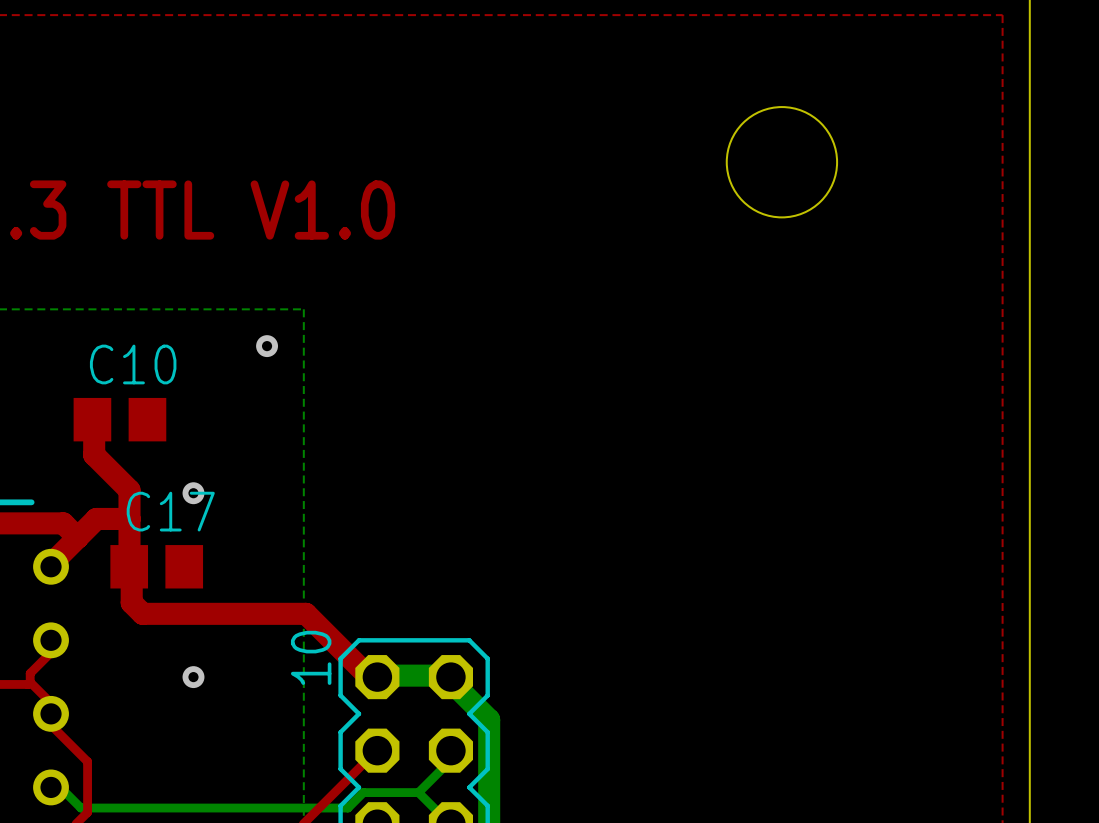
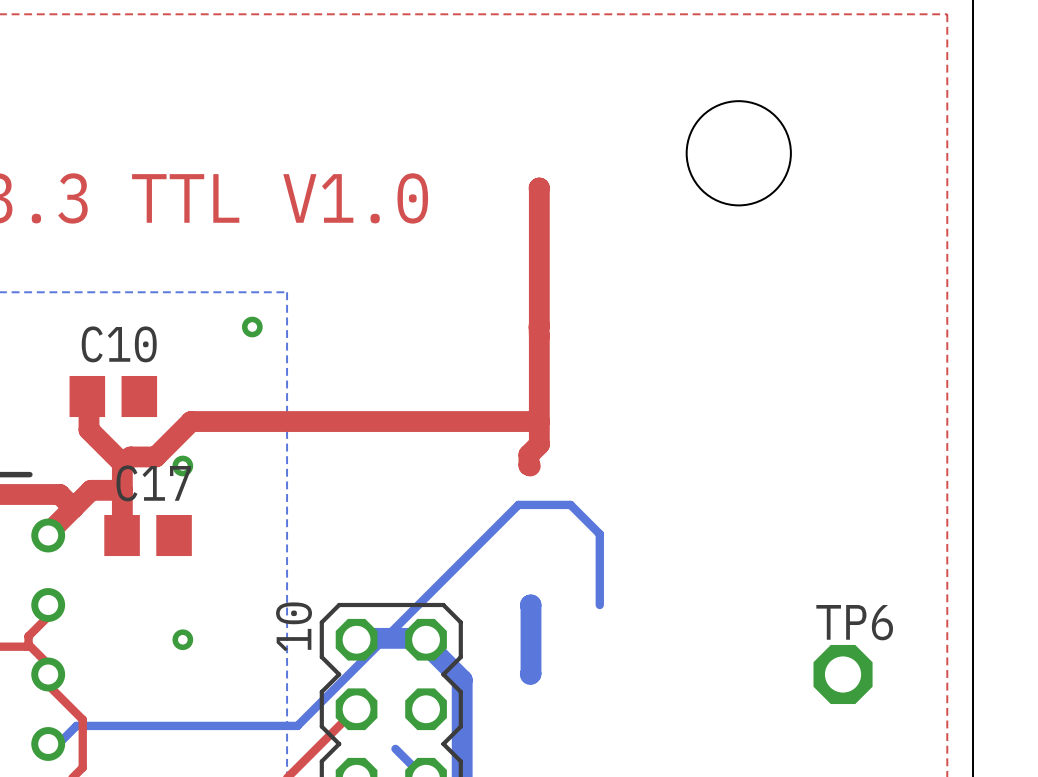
top track: none -> (539, 188) (539, 444) (528, 454) (530, 466)
top track: none -> (539, 421) (191, 421) (155, 456) (130, 456) (122, 463)
top track: (129, 566) (131, 576) (131, 602) (142, 613) (306, 613) (367, 675) (377, 677) -> none
bottom track: none -> (530, 605) (530, 674)
TP6: none -> (843, 674)
bottom track: (450, 750) (449, 761) (418, 792) (363, 792) (347, 808) (80, 808) (61, 788) (51, 787) -> (599, 605) (599, 534) (570, 504) (518, 504) (297, 725) (76, 725) (59, 742) (48, 743)

